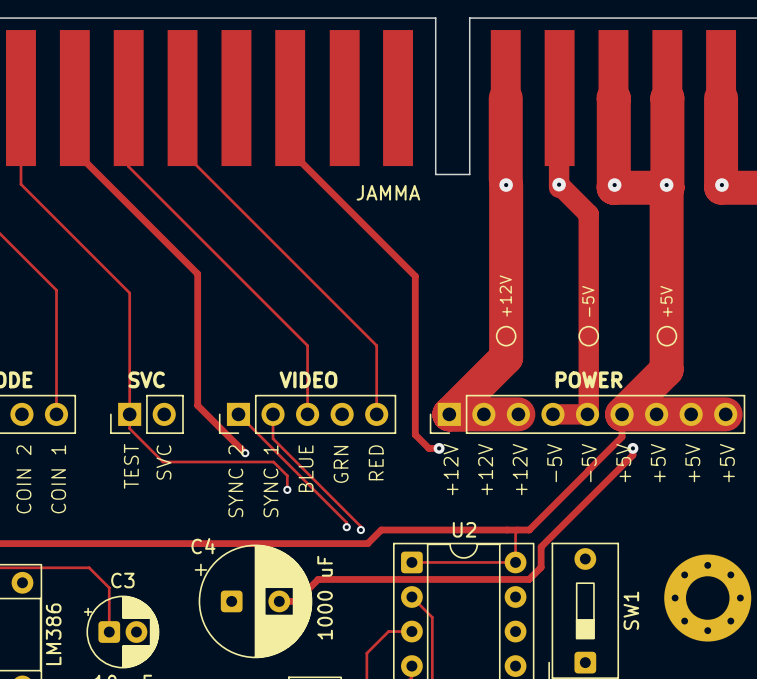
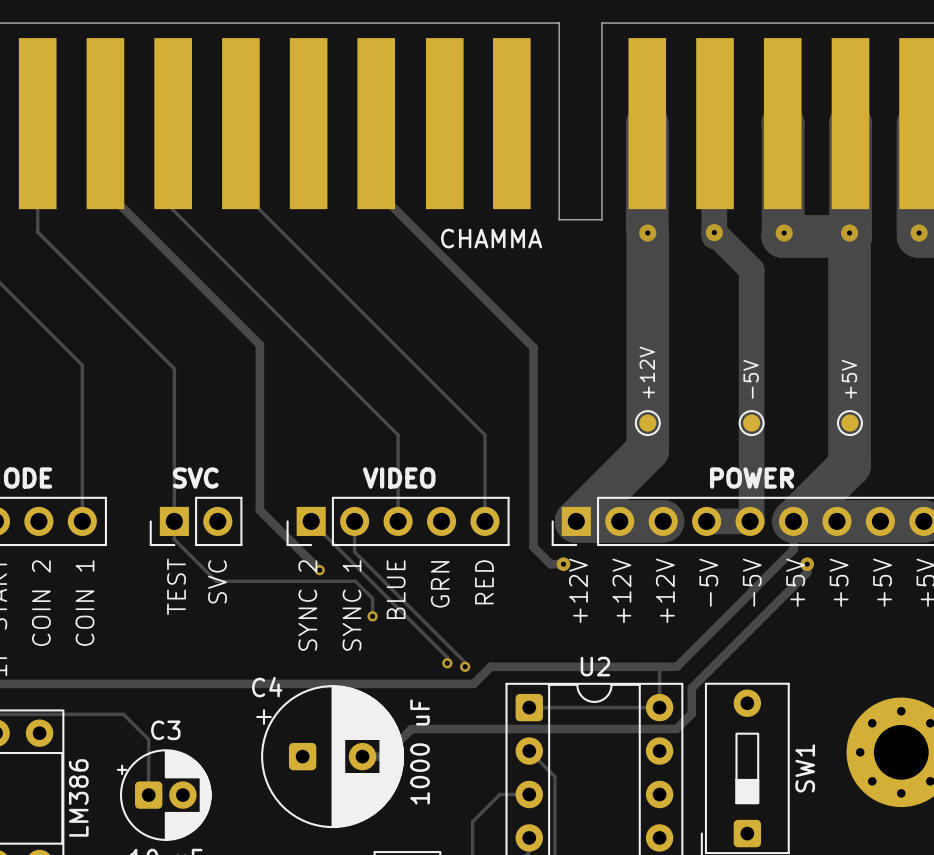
JAMMA name: JAMMA (388, 192) -> CHAMMA (491, 238)

